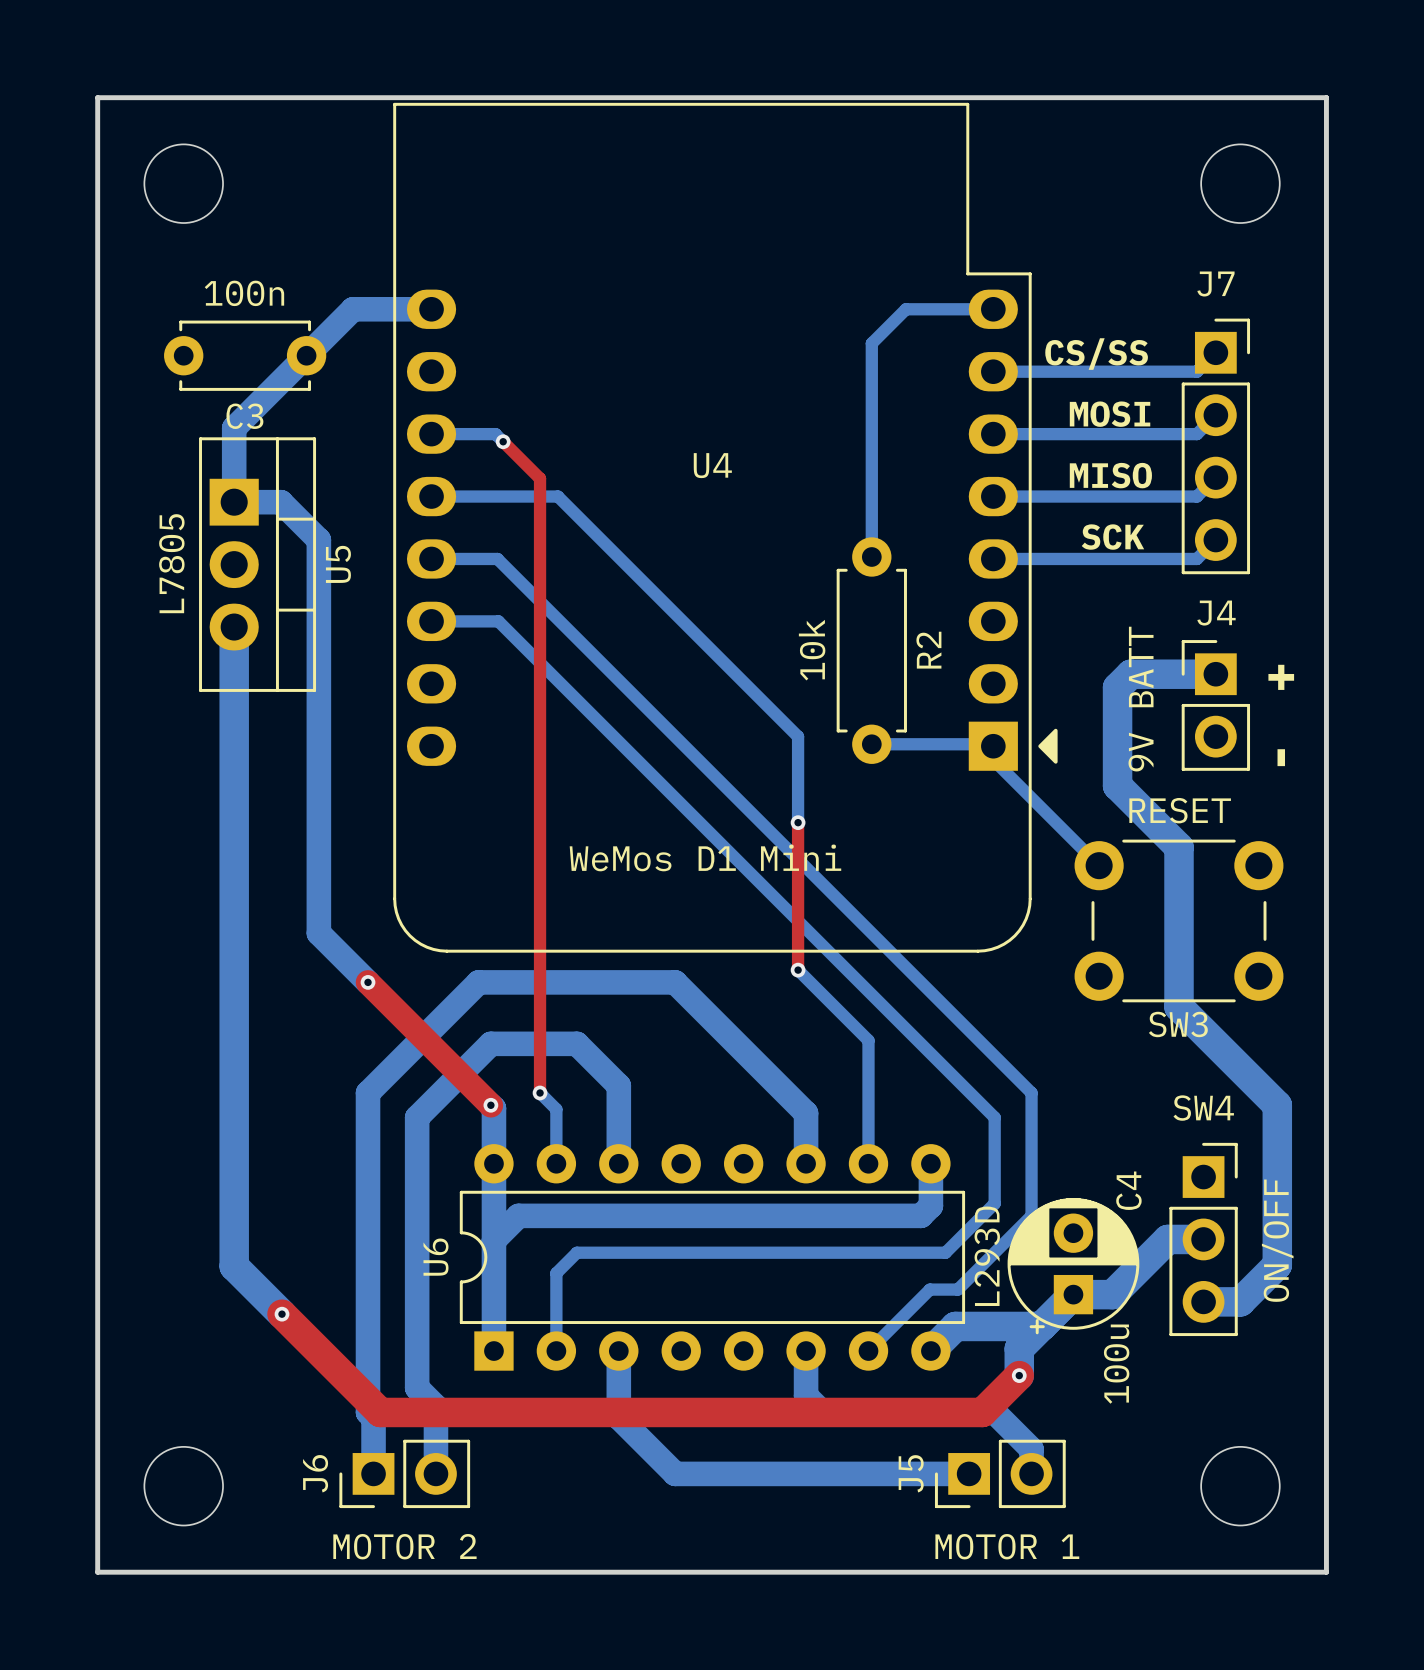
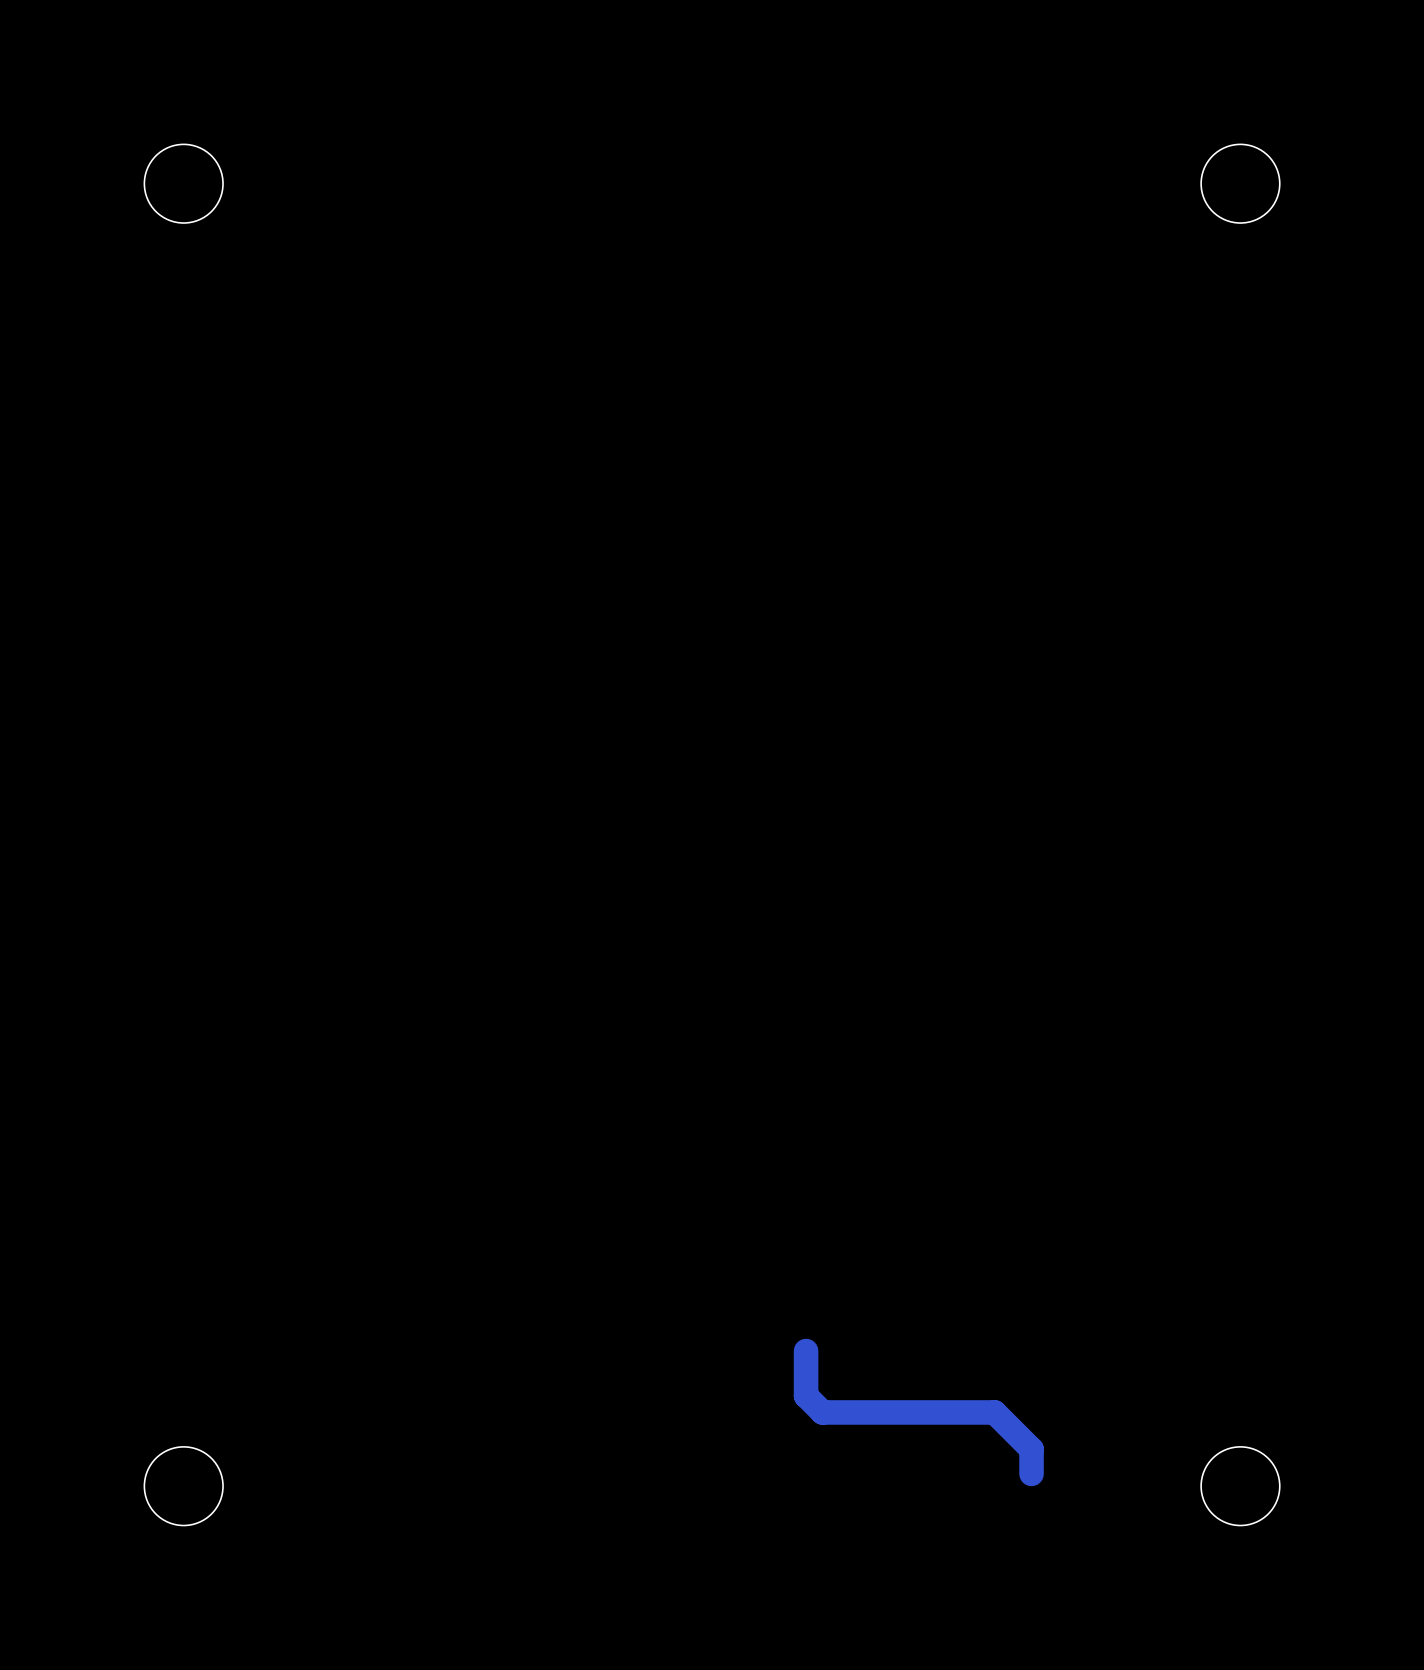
board edge: (97, 97) (1326, 97) (1326, 1572) (97, 1572) (97, 97) -> none
bottom track: (431, 309) (353, 309) (234, 428) (234, 502) (281, 502) (318, 540) (318, 933) (368, 982) -> none
bottom track: (993, 309) (905, 309) (871, 343) (871, 557) -> none
bottom track: (1215, 352) (1196, 371) (993, 371) -> none
text: CS/SS (1096, 354) -> none
C3: 100n (245, 355) -> none
text: MOSI (1110, 414) -> none
bottom track: (1215, 415) (1196, 434) (993, 434) -> none
bottom track: (431, 434) (495, 434) (503, 441) -> none
top track: (503, 441) (540, 478) (540, 1092) -> none
via: (503, 441) -> none
J7: (1215, 446) -> none
text: MISO (1110, 475) -> none
bottom track: (1215, 477) (1196, 496) (993, 496) -> none
bottom track: (431, 496) (557, 496) (798, 736) (798, 822) -> none
U4: WeMos D1 Mini (725, 527) -> none
text: SCK (1112, 537) -> none
bottom track: (1215, 540) (1196, 558) (993, 558) -> none
bottom track: (431, 558) (497, 558) (1031, 1092) (1031, 1215) (957, 1289) (929, 1289) (868, 1351) -> none
U5: L7805 (257, 564) -> none
bottom track: (431, 621) (498, 621) (994, 1117) (994, 1203) (945, 1252) (576, 1252) (556, 1273) (556, 1351) -> none
bottom track: (234, 627) (234, 1266) (282, 1314) -> none
R2: 10k (871, 650) -> none
bottom track: (1215, 674) (1130, 674) (1117, 687) (1117, 785) (1179, 847) (1179, 1006) (1277, 1105) (1277, 1265) (1240, 1301) (1203, 1301) -> none
text: + (1281, 677) -> none
J4: 9V BATT (1215, 705) -> none
bottom track: (871, 744) (991, 744) (993, 746) (993, 759) (1099, 865) -> none
text: - (1281, 757) -> none
top track: (798, 822) (798, 970) -> none
via: (798, 822) -> none
SW3: RESET (1179, 920) -> none
bottom track: (798, 970) (868, 1040) (868, 1163) -> none
via: (798, 970) -> none
top track: (368, 982) (490, 1105) -> none
via: (368, 982) -> none
bottom track: (540, 1092) (556, 1109) (556, 1163) -> none
via: (540, 1092) -> none
bottom track: (490, 1105) (493, 1108) (493, 1351) -> none
via: (490, 1105) -> none
bottom track: (618, 1163) (618, 1085) (576, 1043) (490, 1043) (417, 1117) (417, 1387) (435, 1406) (435, 1473) -> none
bottom track: (806, 1163) (806, 1113) (675, 982) (478, 982) (368, 1092) (368, 1412) (373, 1418) (373, 1473) -> none
bottom track: (930, 1163) (930, 1205) (920, 1215) (518, 1215) (493, 1240) -> none
bottom track: (1203, 1239) (1167, 1239) (1112, 1294) (1073, 1294) (1019, 1348) (1019, 1375) -> none
SW4: ON/OFF (1203, 1239) -> none
U6: L293D (712, 1257) -> none
C4: 100u (1073, 1266) -> none
top track: (282, 1314) (380, 1412) (982, 1412) (1019, 1375) -> none
via: (282, 1314) -> none
bottom track: (1041, 1326) (955, 1326) (930, 1351) -> none
bottom track: (618, 1351) (618, 1417) (675, 1473) (969, 1473) -> none
via: (1019, 1375) -> none
J6: MOTOR 2 (404, 1473) -> none
J5: MOTOR 1 (1000, 1473) -> none

